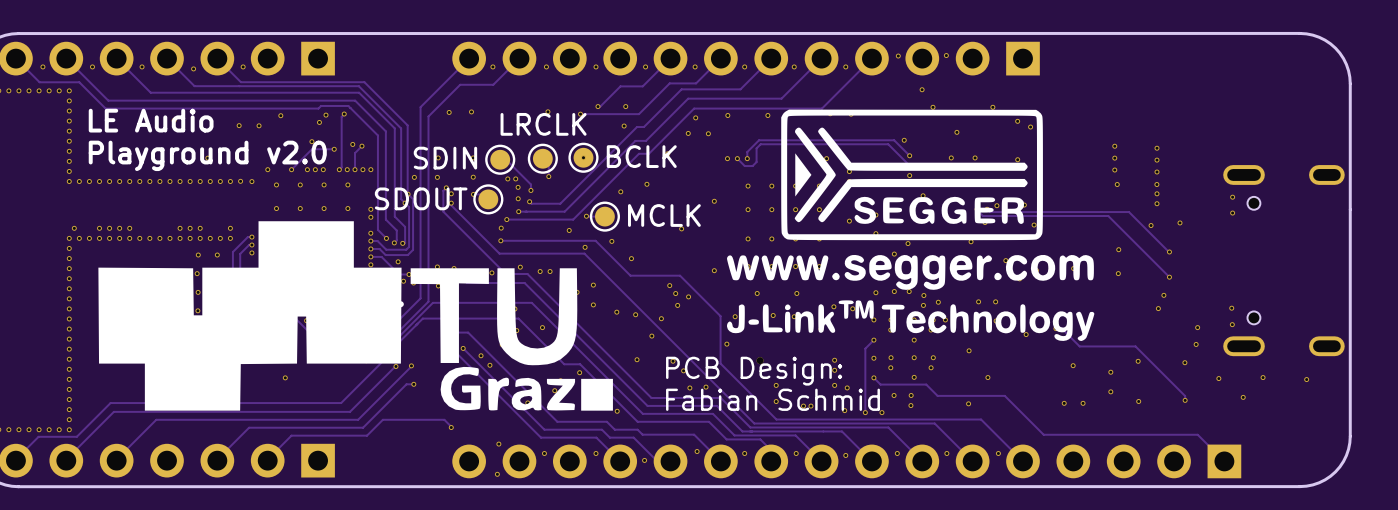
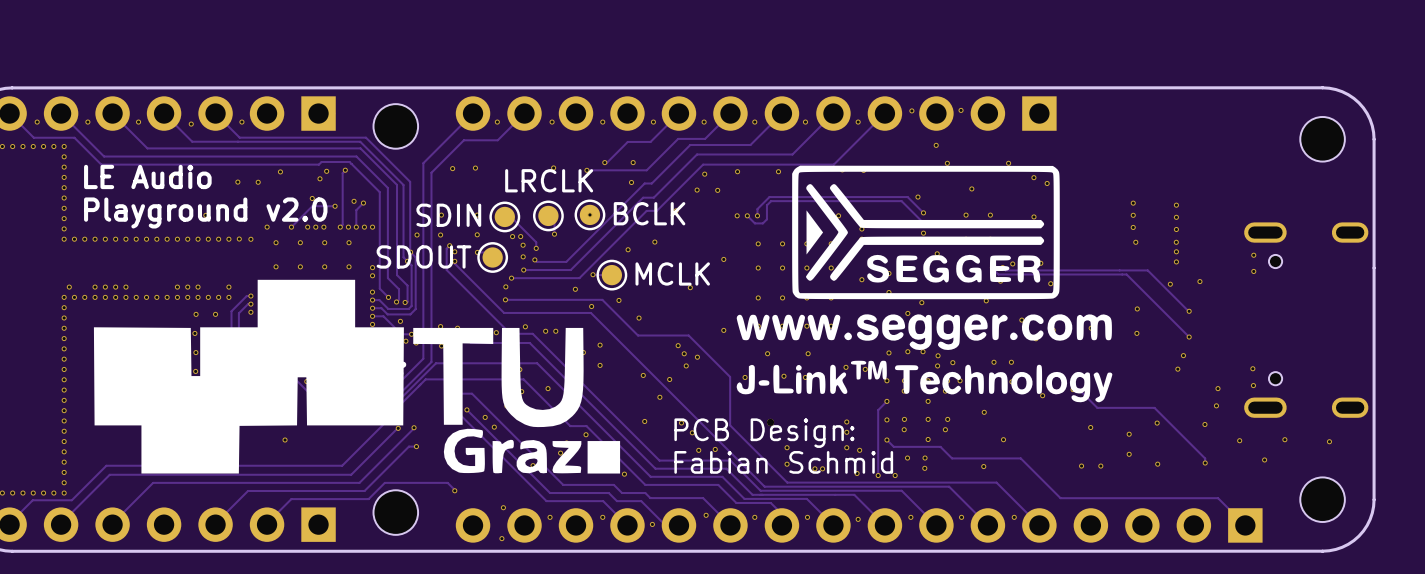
part: none -> (395, 126)
part: none -> (1322, 139)
via: (616, 312) -> none
via: (726, 344) -> none
part: none -> (1322, 499)
part: none -> (395, 512)

